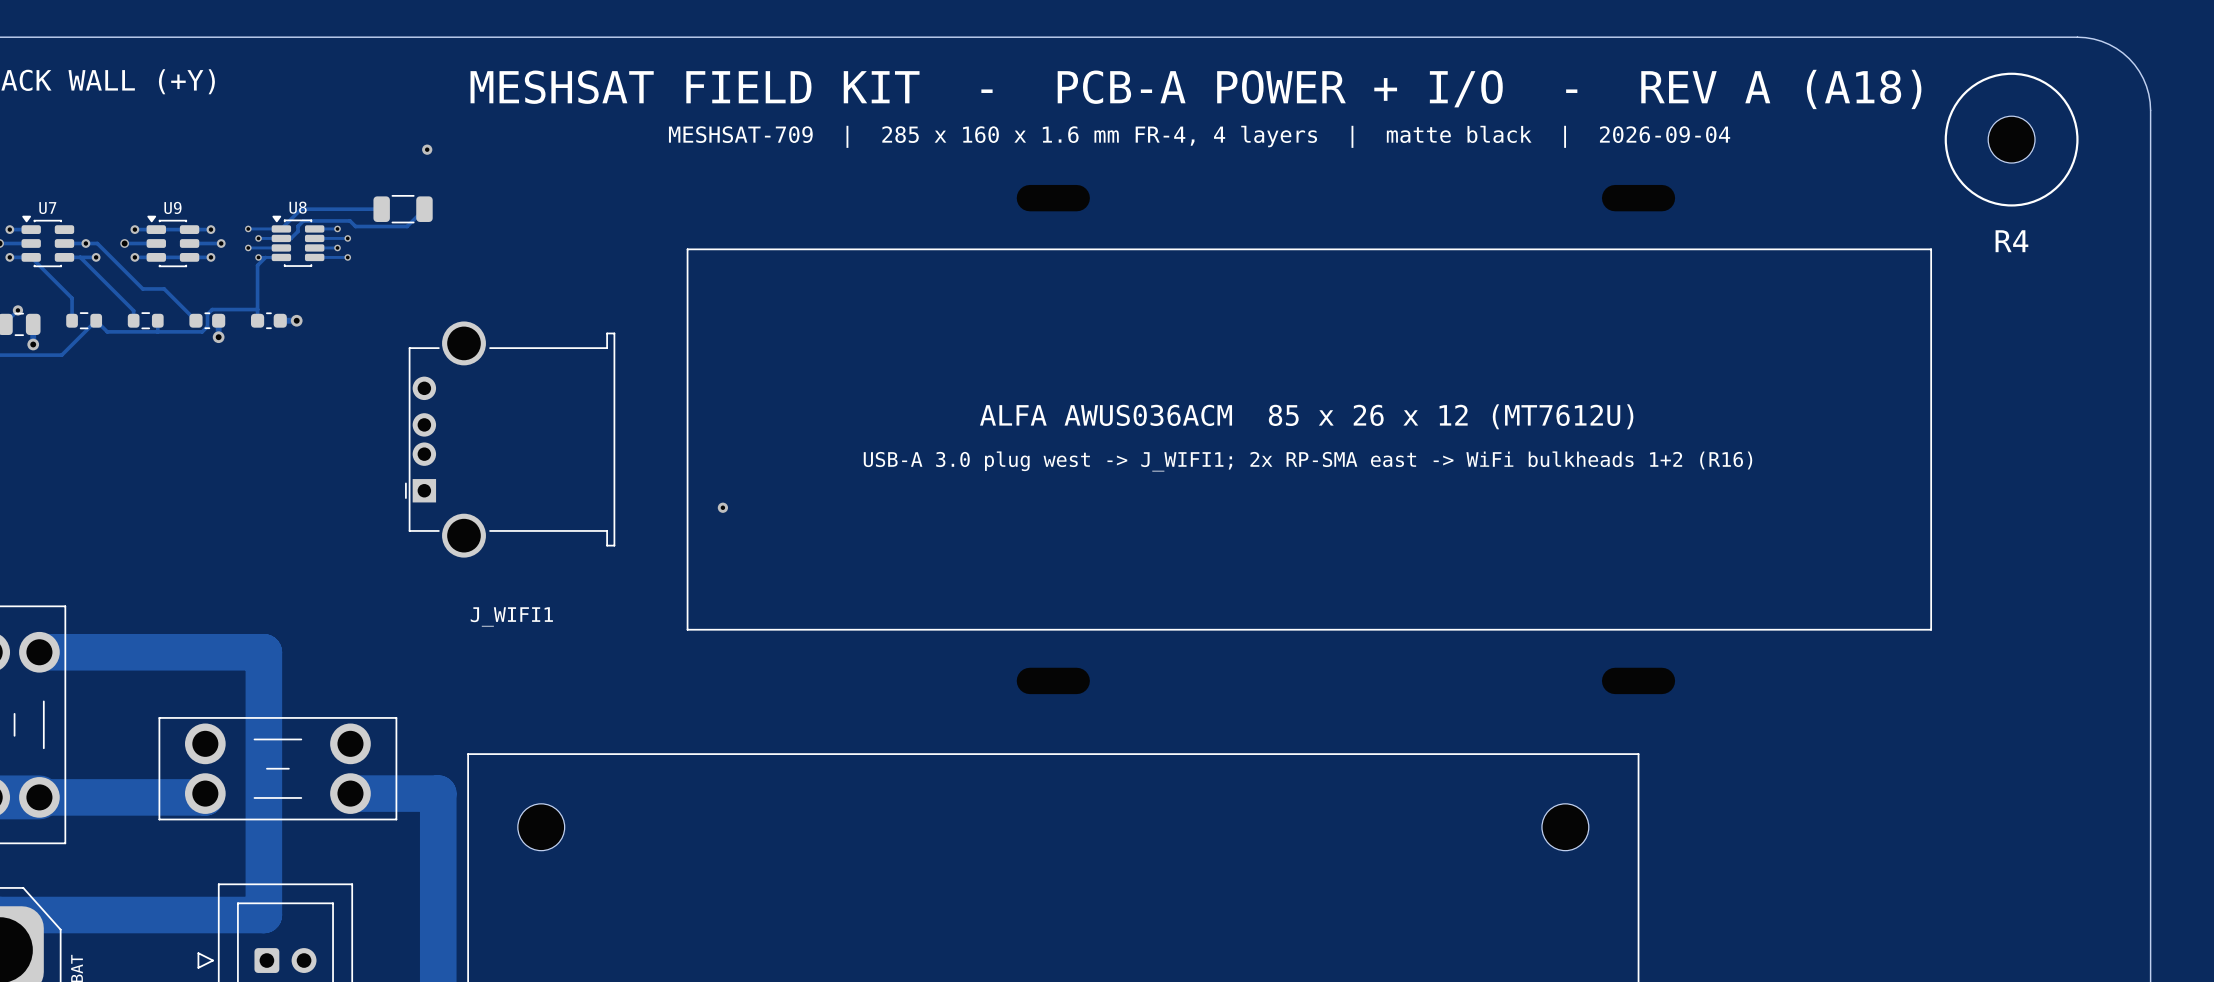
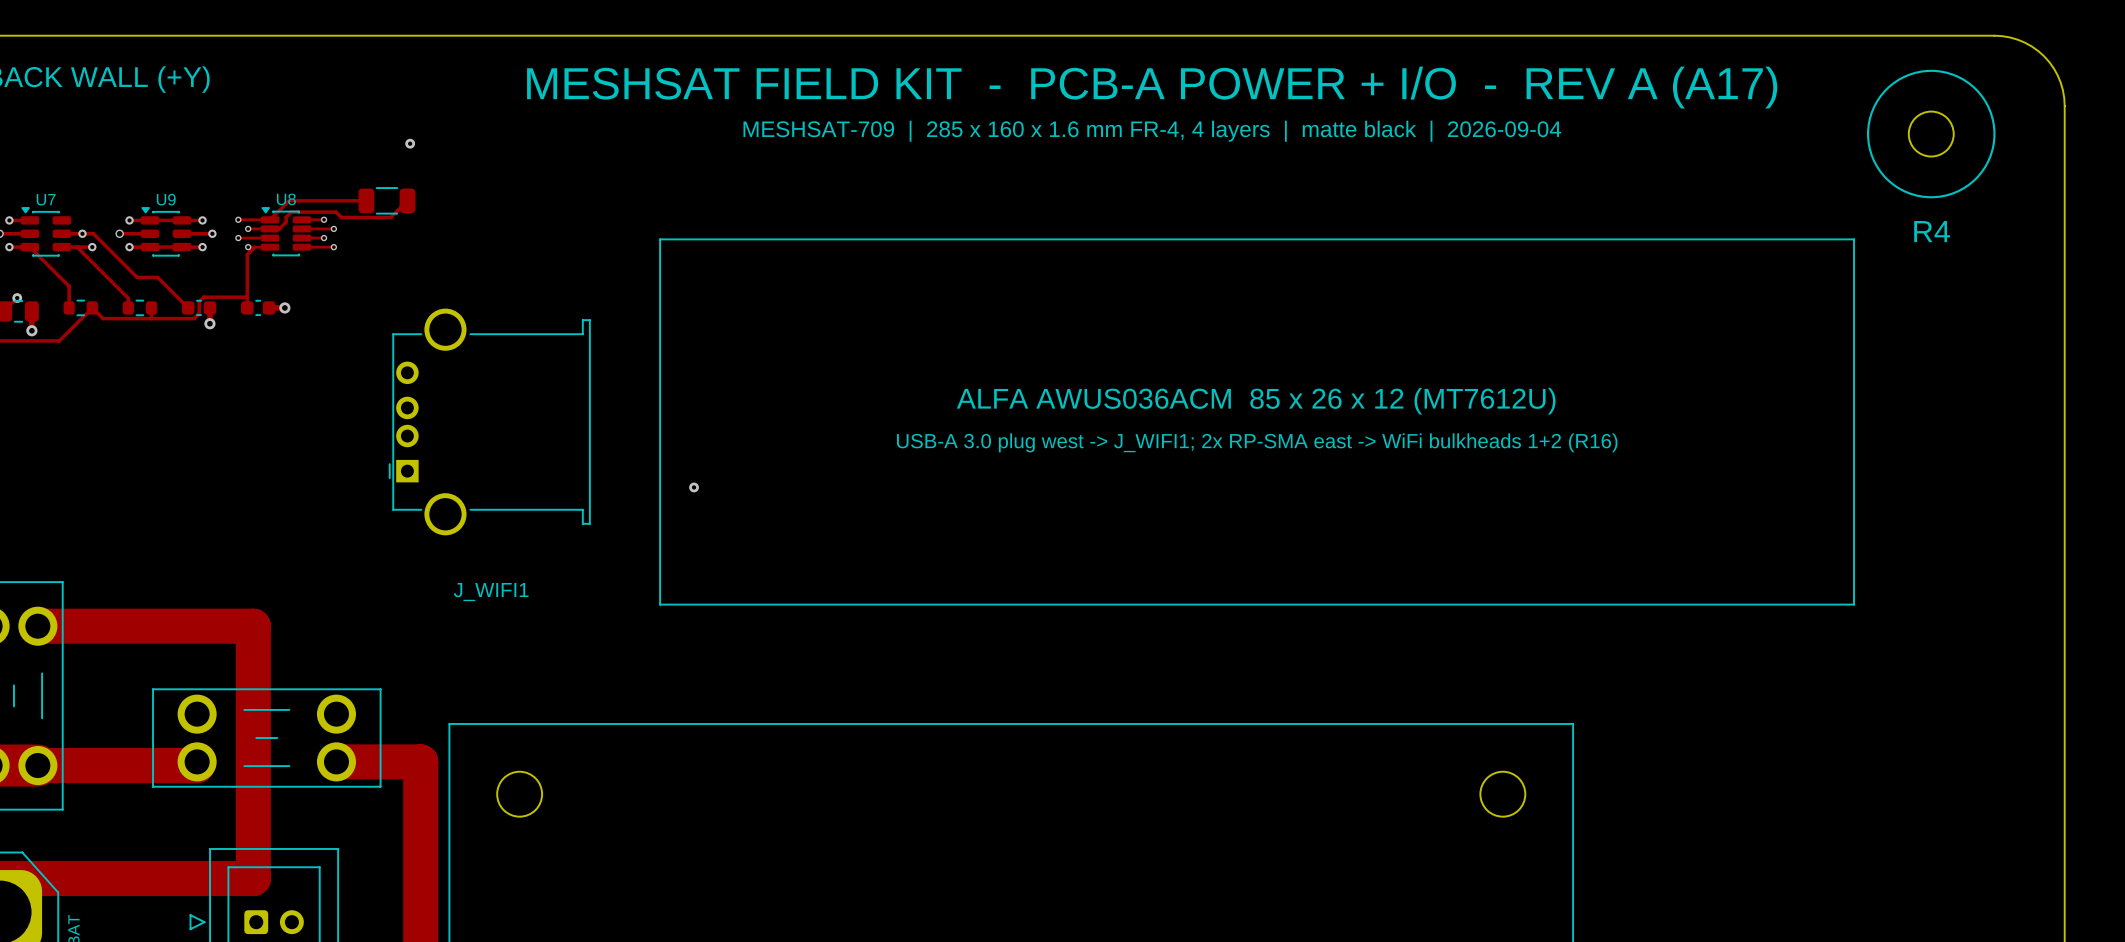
text: MESHSAT FIELD KIT - PCB-A POWER + I/O - REV A (A18) (1195, 89) -> MESHSAT FIELD KIT - PCB-A POWER + I/O - REV A (A17) (1152, 87)

